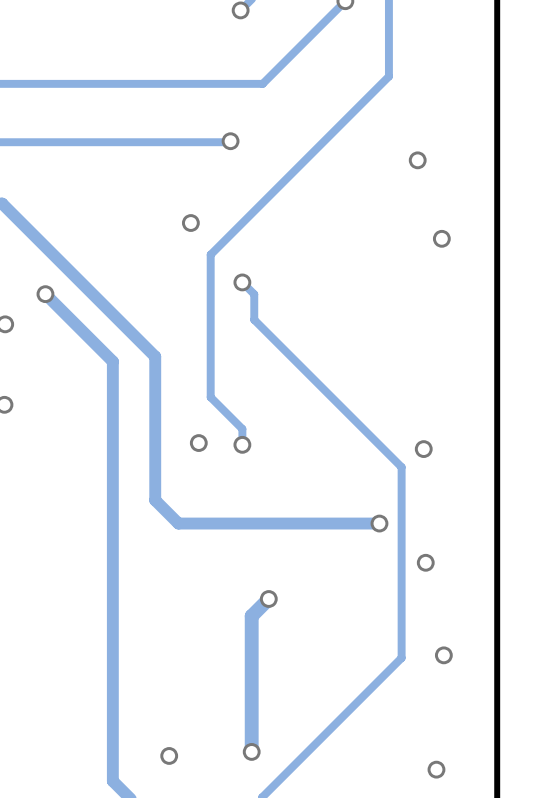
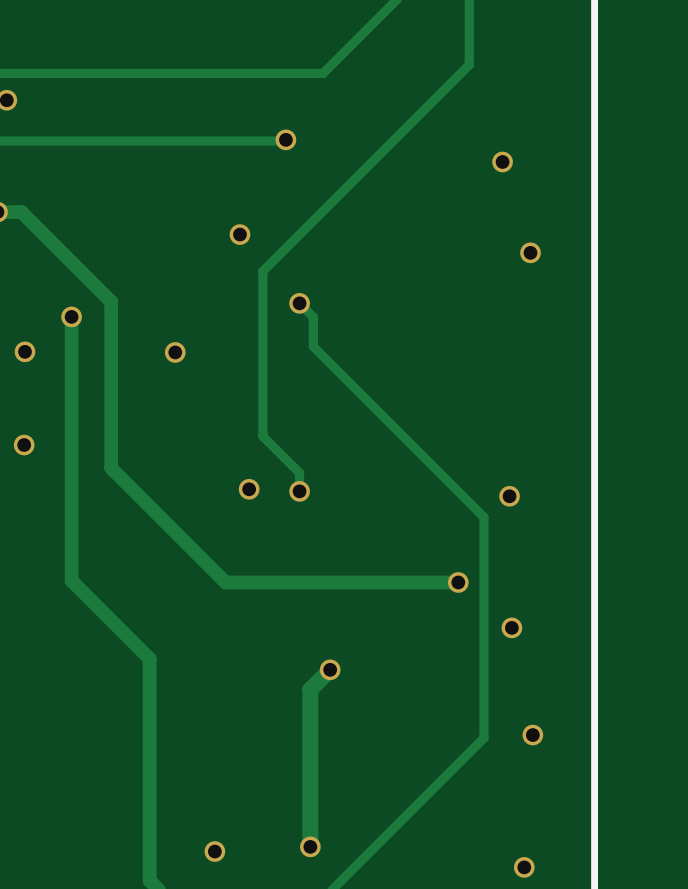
track: (79, 281) (155, 356) (155, 500) -> (111, 301) (111, 468) (198, 555)
track: (45, 294) (112, 361) (112, 589) -> (71, 316) (71, 580) (149, 658)
via: none -> (175, 352)

